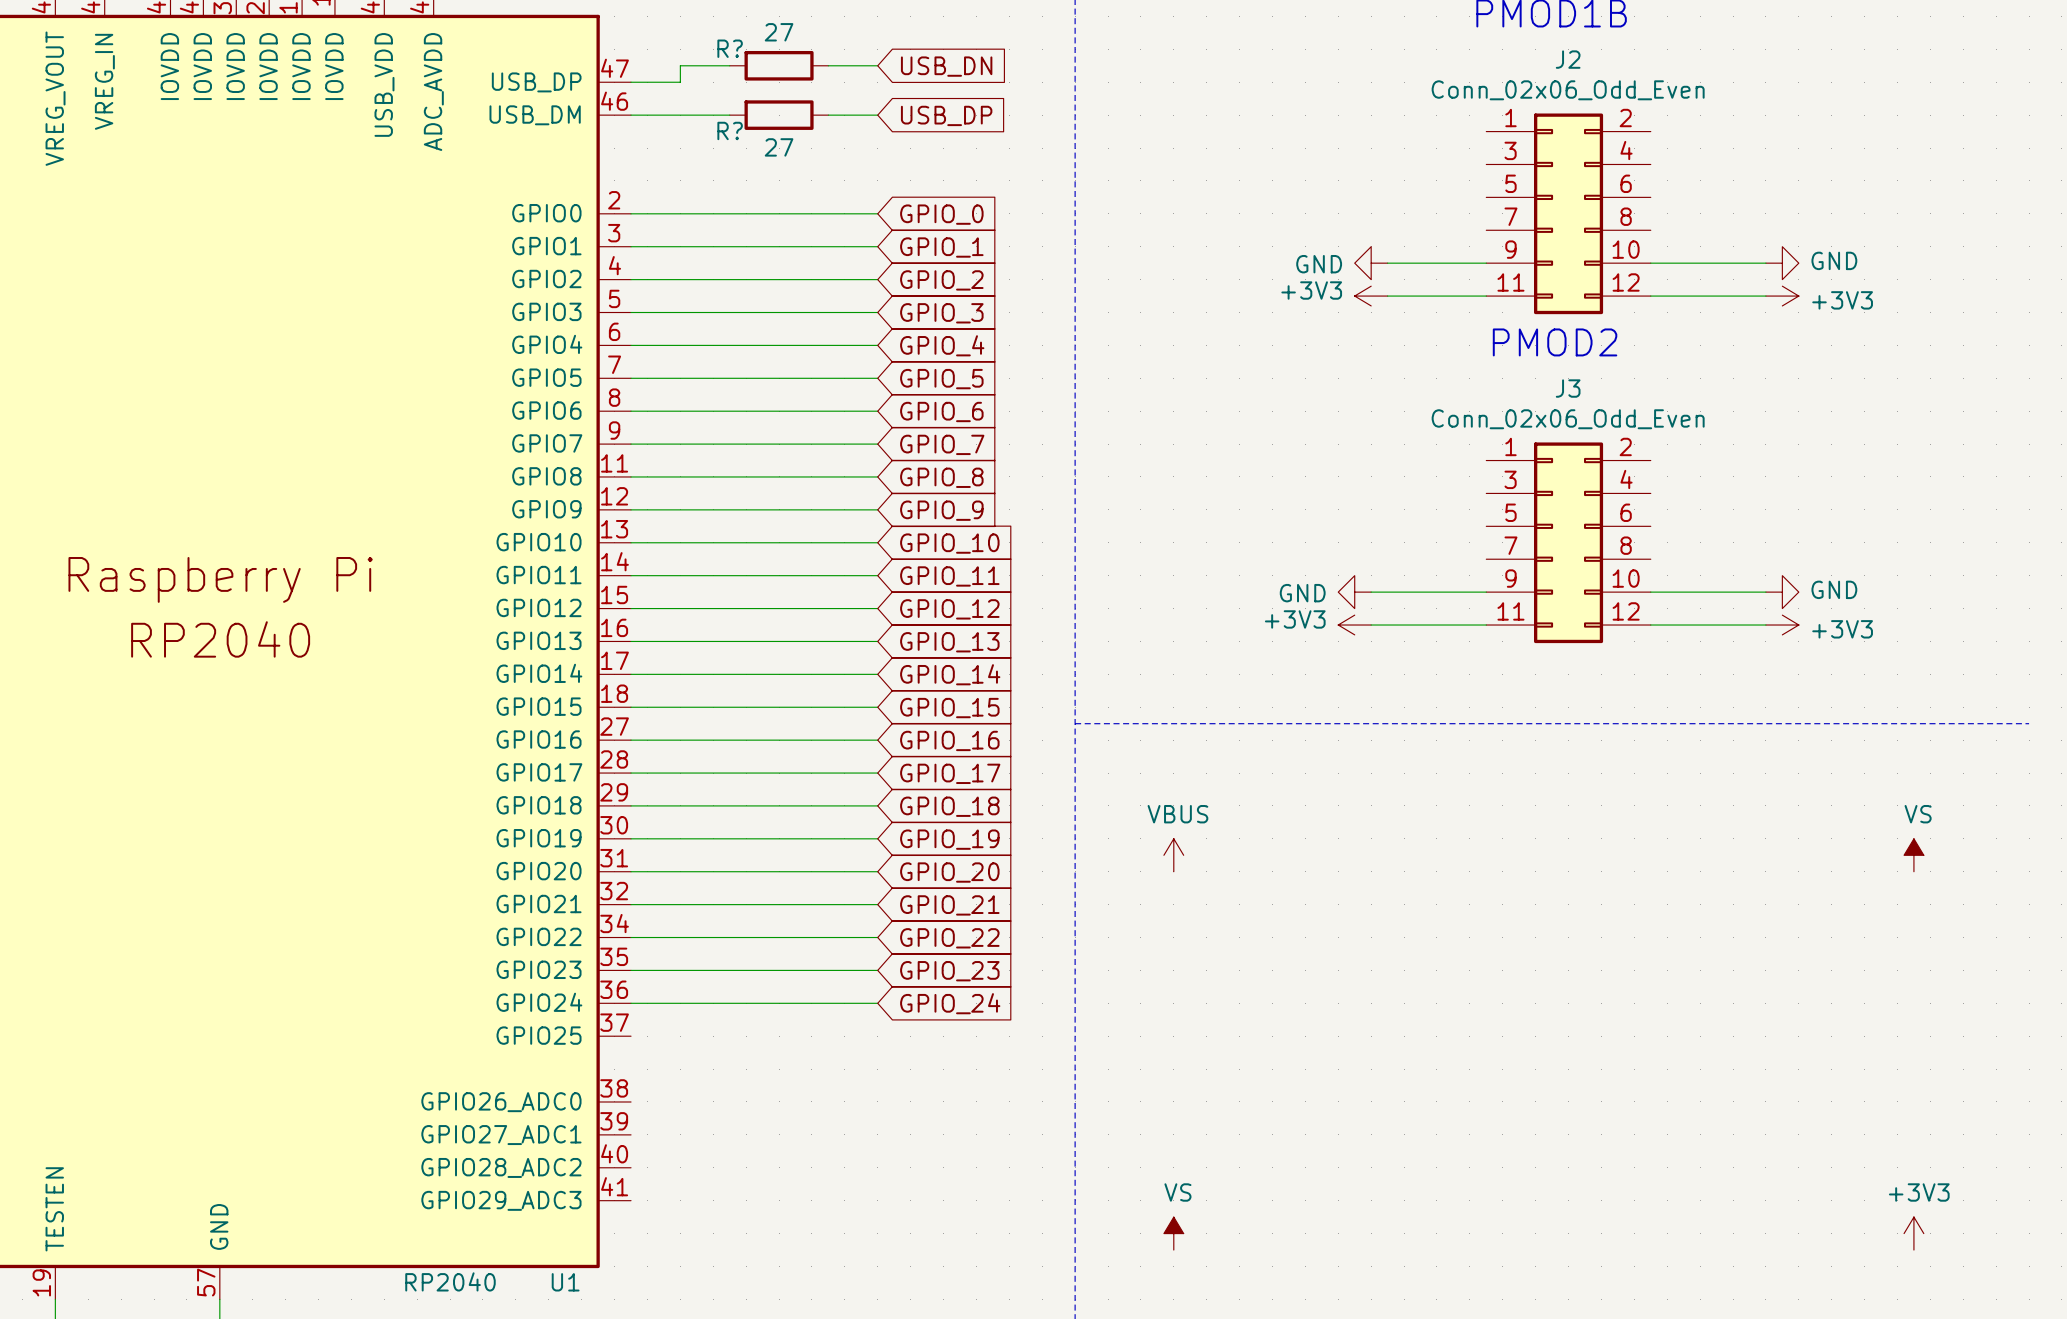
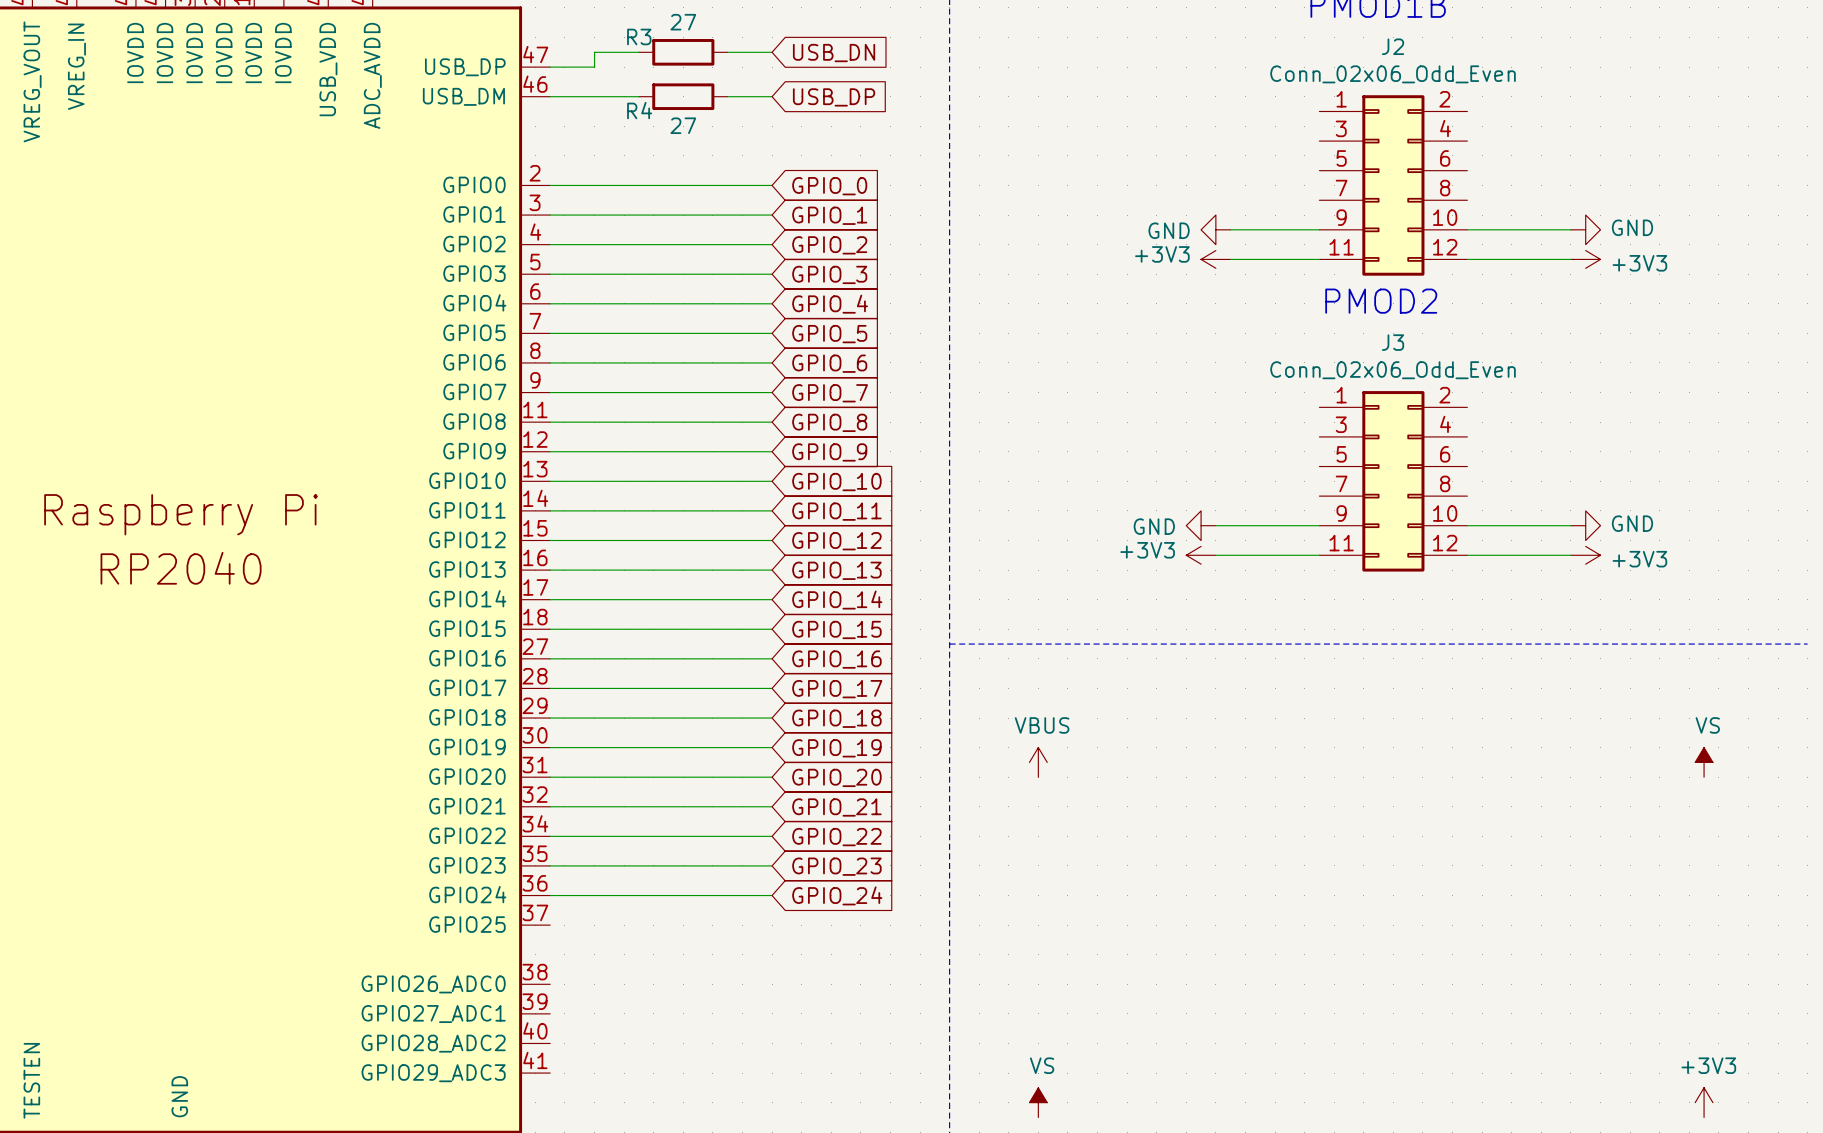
R? name: R? (730, 48) -> R3 (639, 36)
R? name: R? (730, 130) -> R4 (639, 110)

